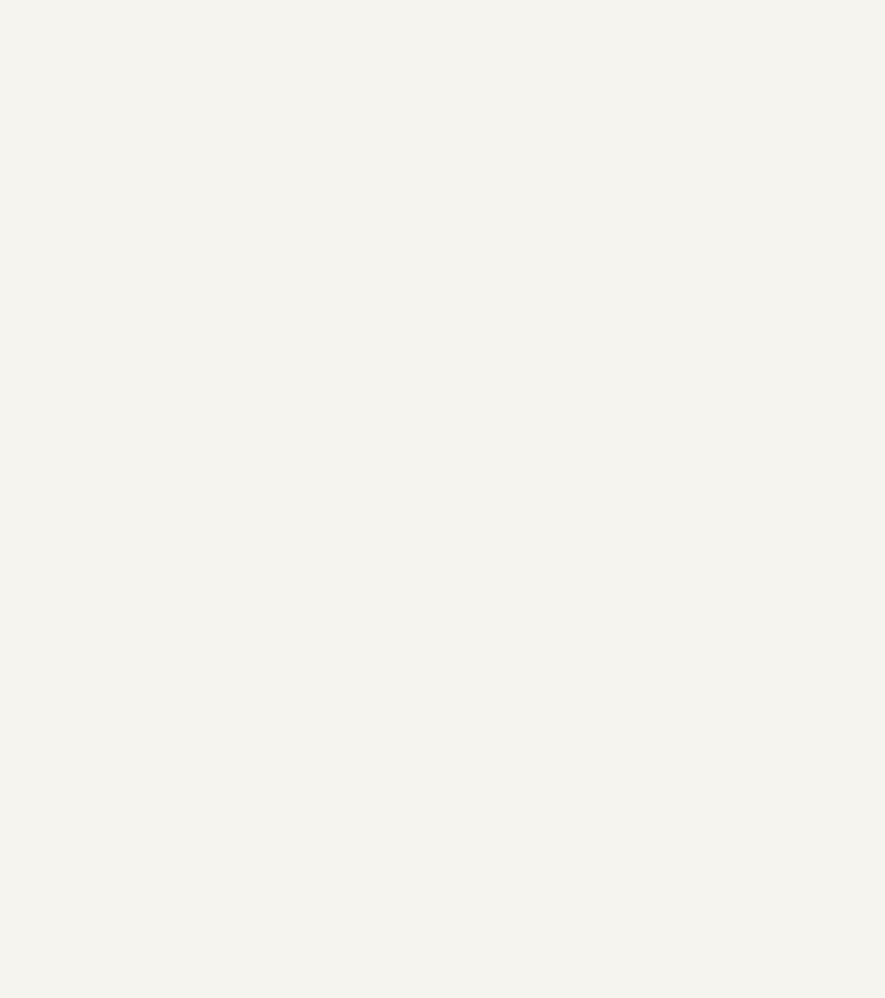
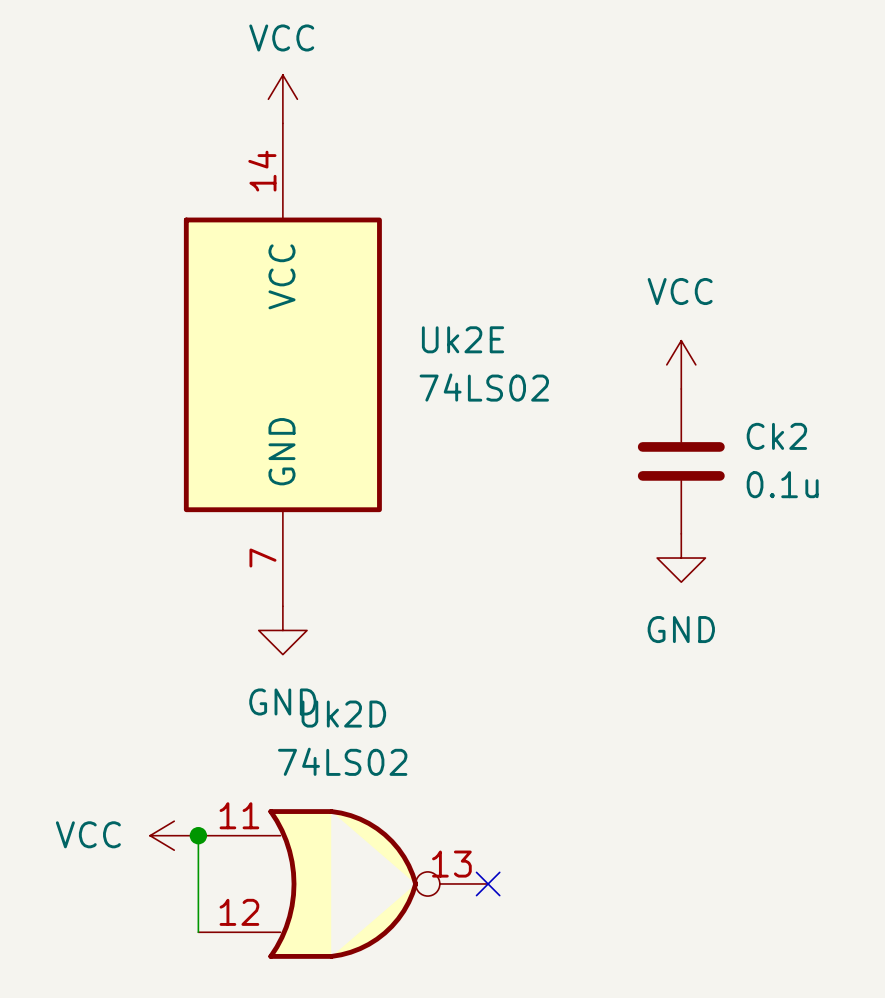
power symbol: none -> VCC (282, 99)
Uk2E: none -> 74LS02 (282, 364)
power symbol: none -> VCC (681, 364)
Ck2: none -> 0.1u (681, 461)
power symbol: none -> GND (681, 558)
power symbol: none -> GND (282, 630)
power symbol: none -> VCC (174, 835)
wire: none -> (198, 835) (198, 932)
junction: none -> (198, 835)
Uk2D: none -> 74LS02 (343, 883)
no-connect mark: none -> (488, 883)

